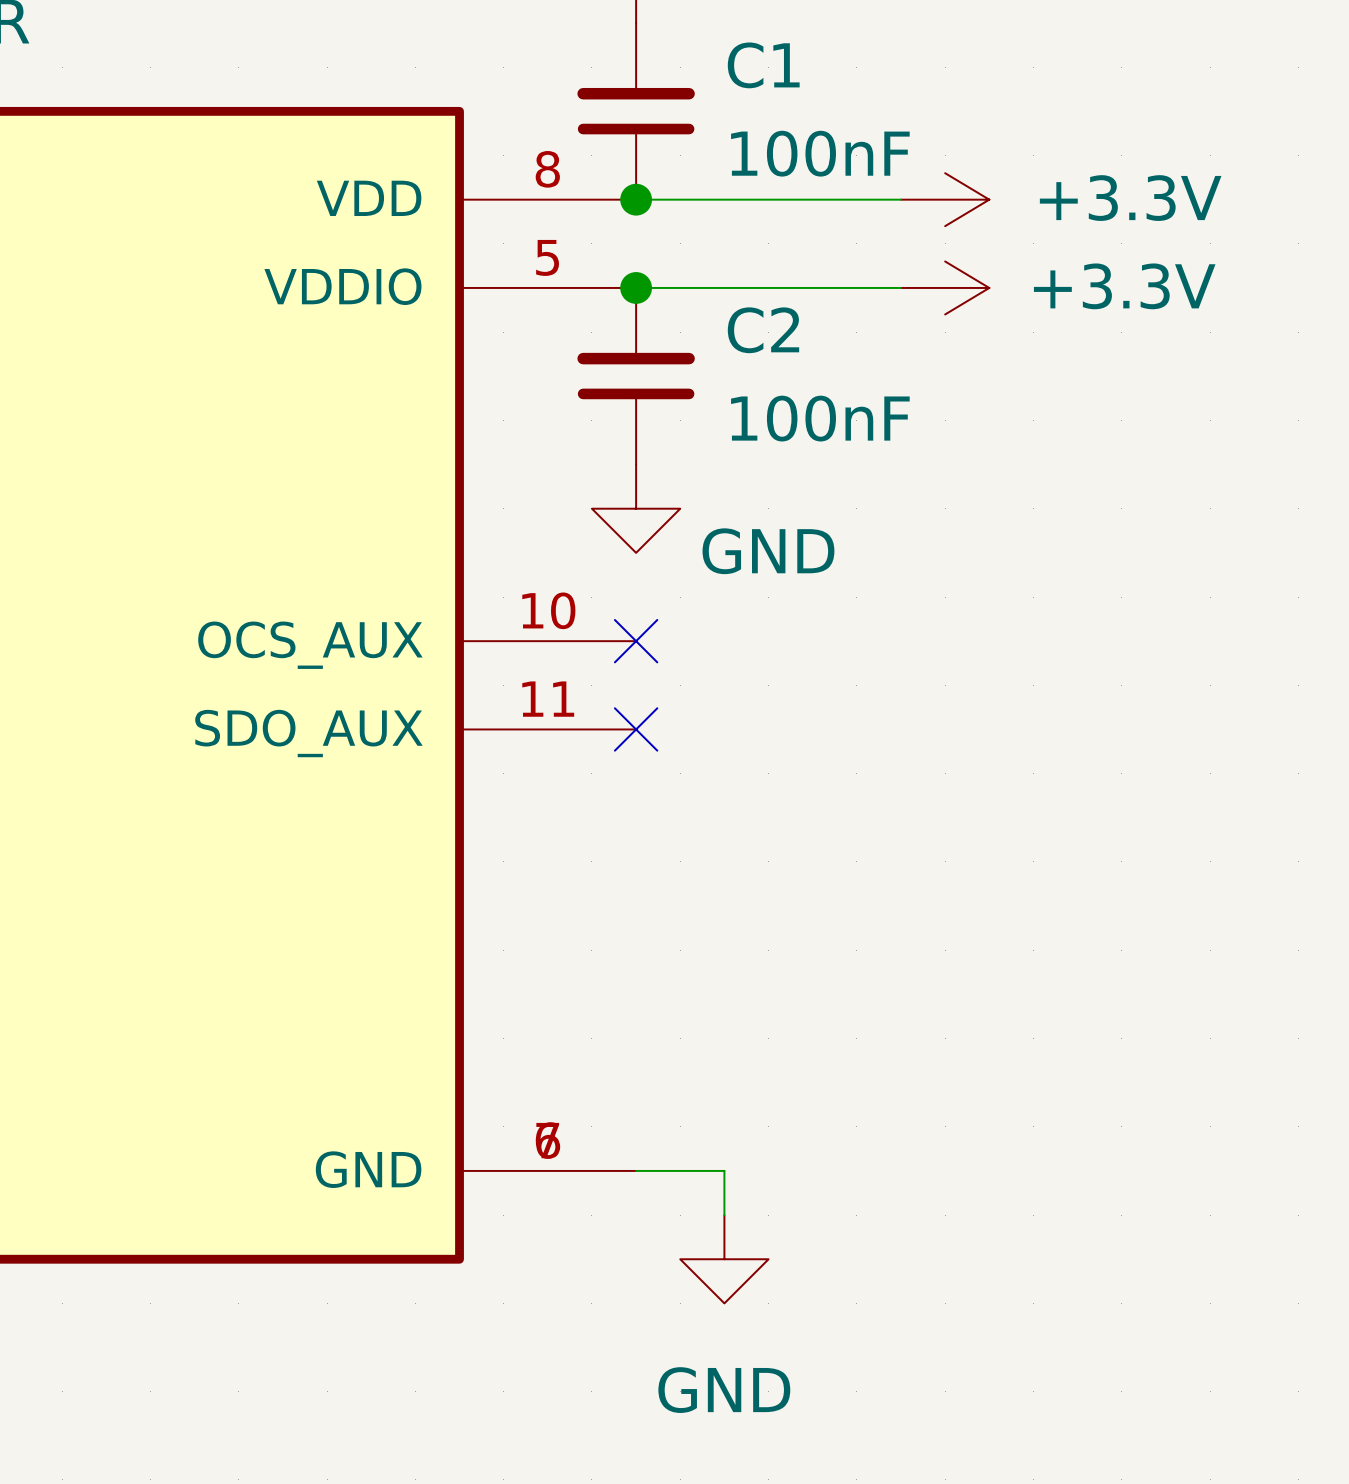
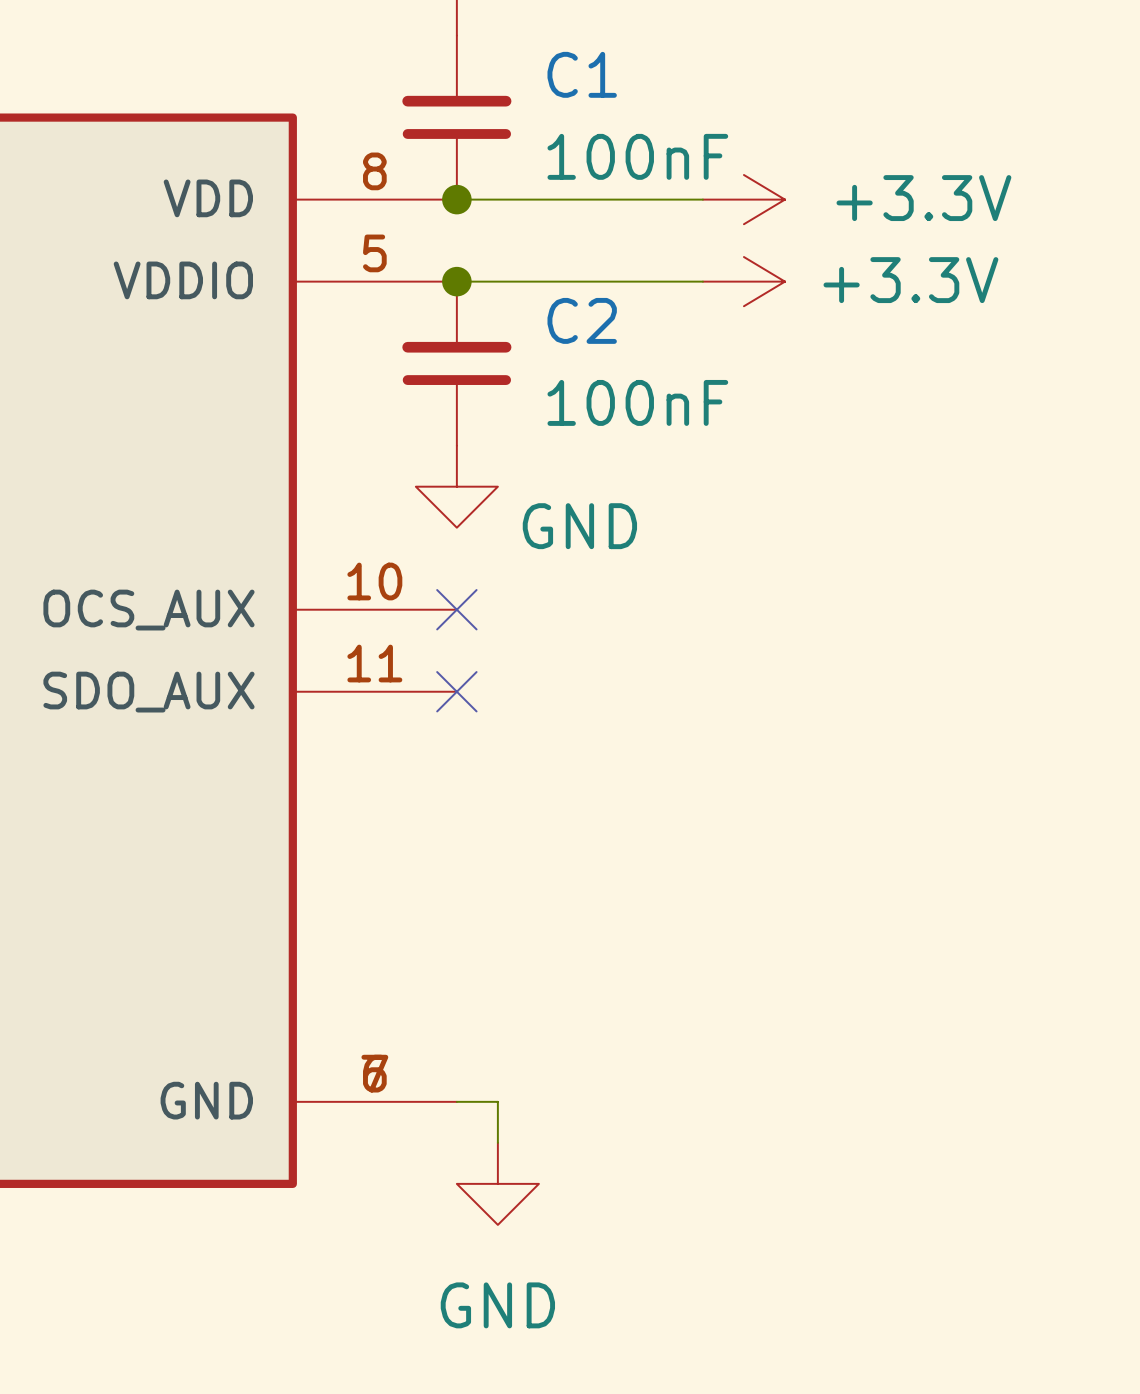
wire: (680, 1170) (724, 1170) (724, 1215) -> (497, 1101) (497, 1142)
power symbol position: GND (724, 1259) -> GND (497, 1183)

